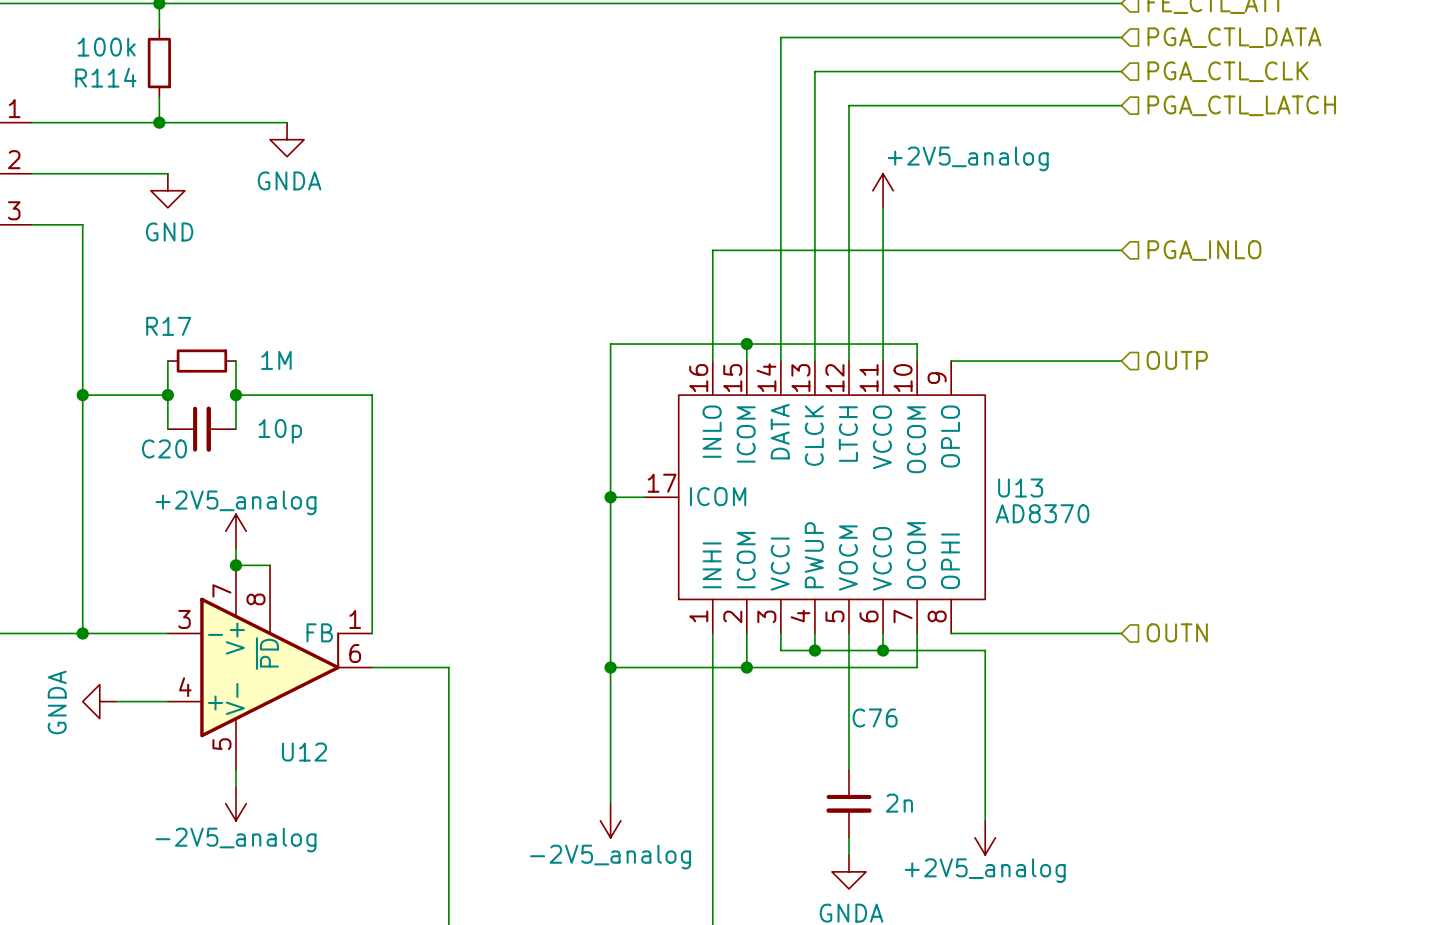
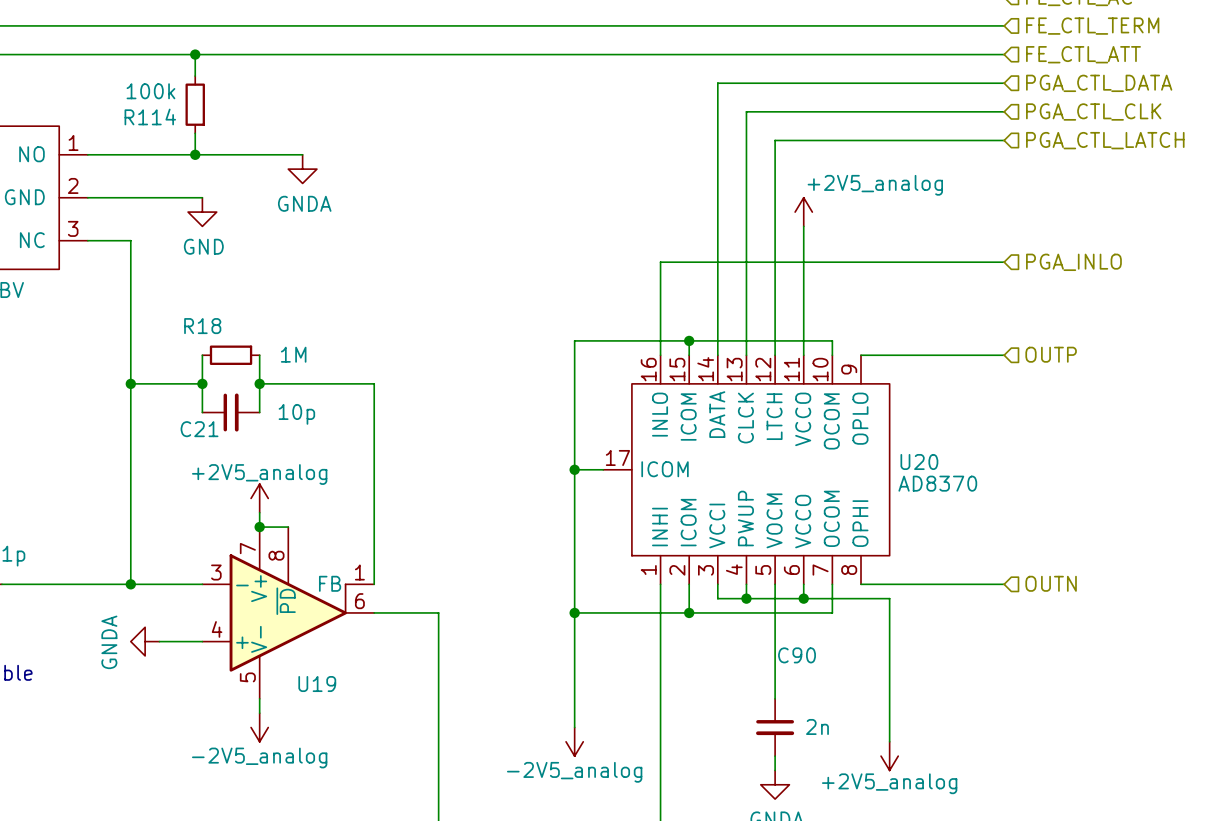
R17 name: R17 (168, 326) -> R18 (202, 326)
C20 name: C20 (164, 448) -> C21 (199, 429)
U13 name: U13 (1020, 488) -> U20 (919, 461)
C76 name: C76 (875, 717) -> C90 (797, 655)
U12 name: U12 (304, 752) -> U19 (317, 684)

